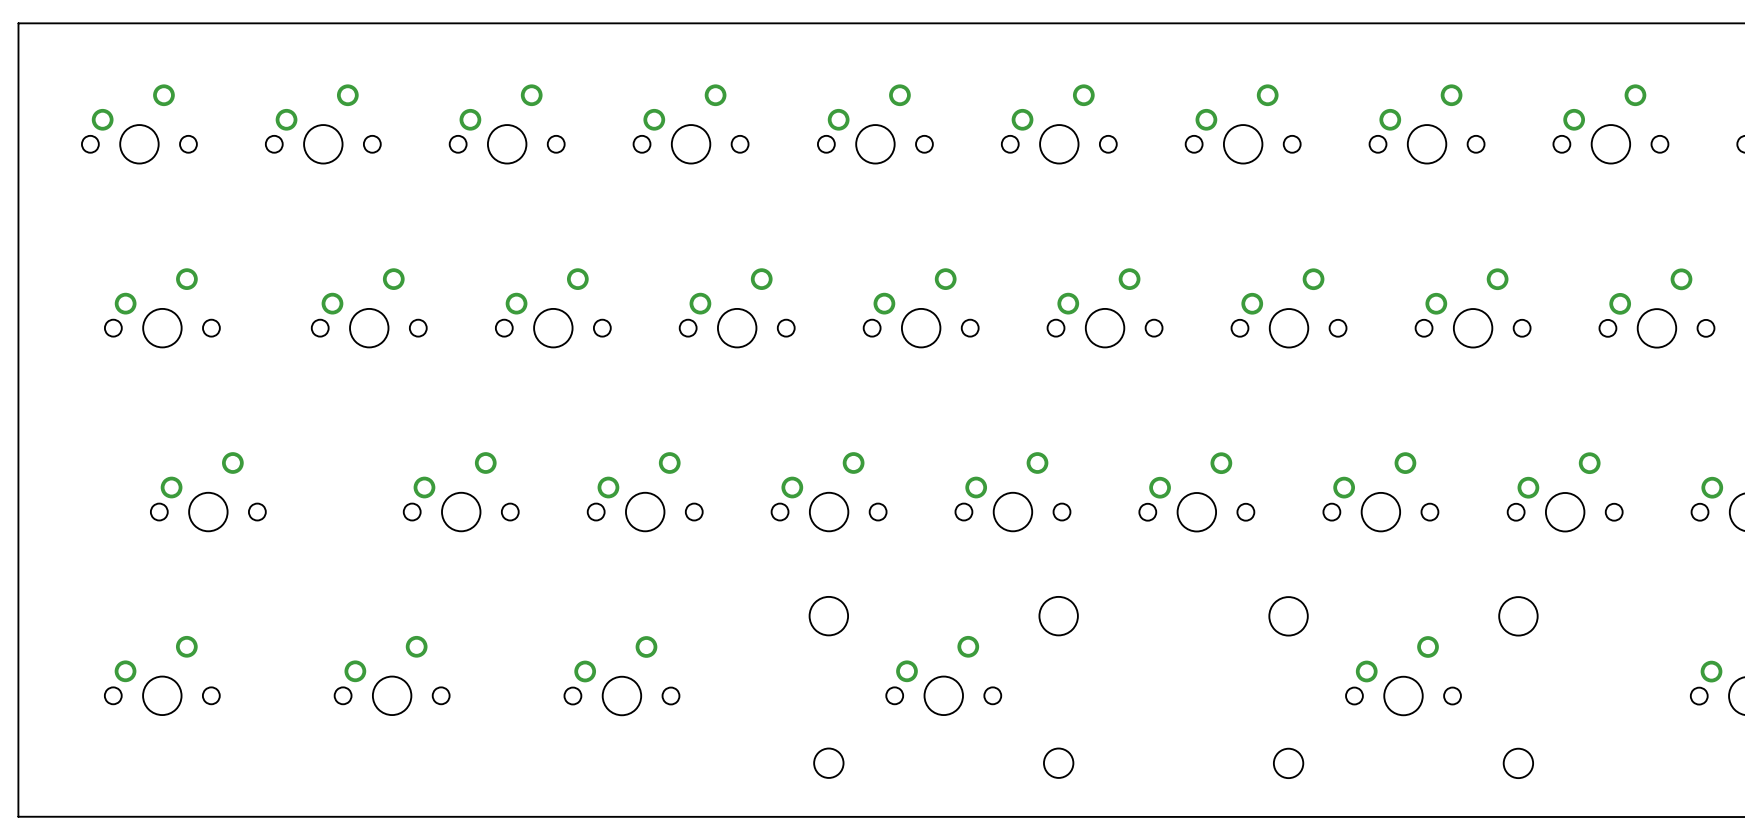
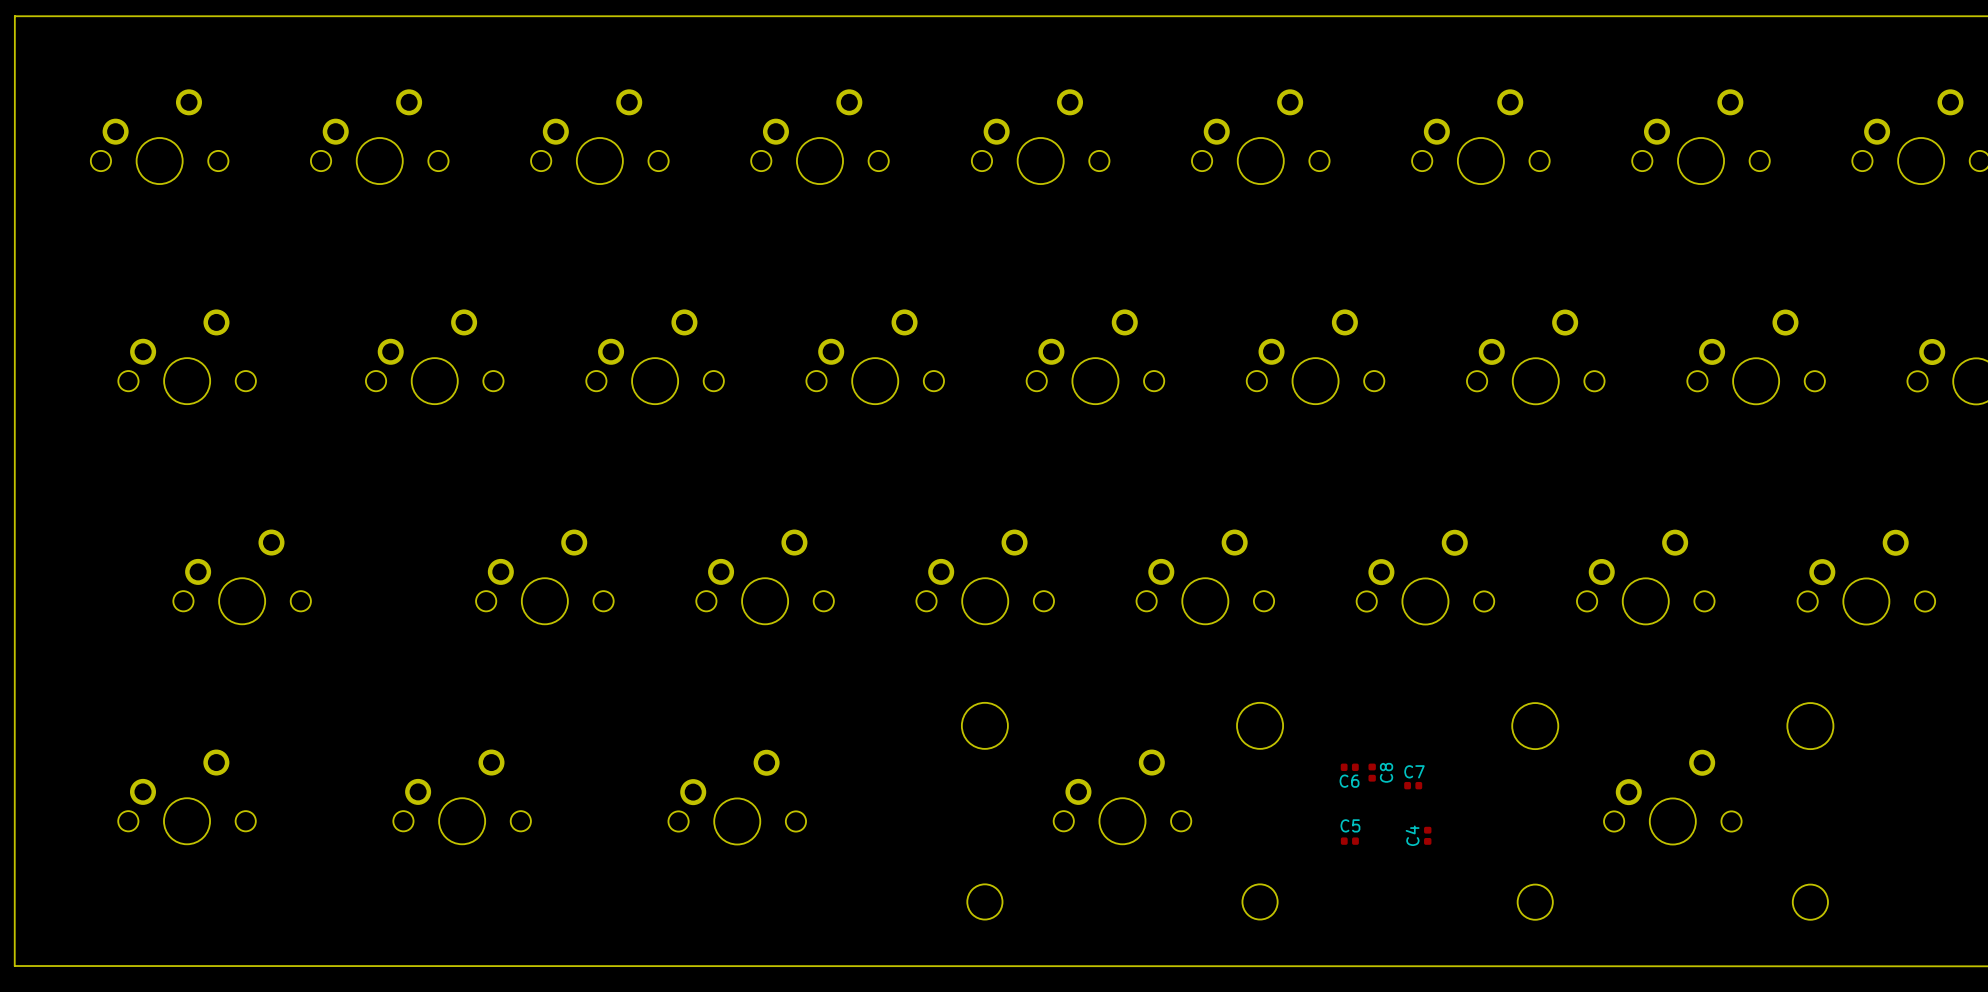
C6: none -> (1349, 767)
C8: none -> (1372, 772)
C7: none -> (1413, 785)
C4: none -> (1427, 835)
C5: none -> (1349, 841)

